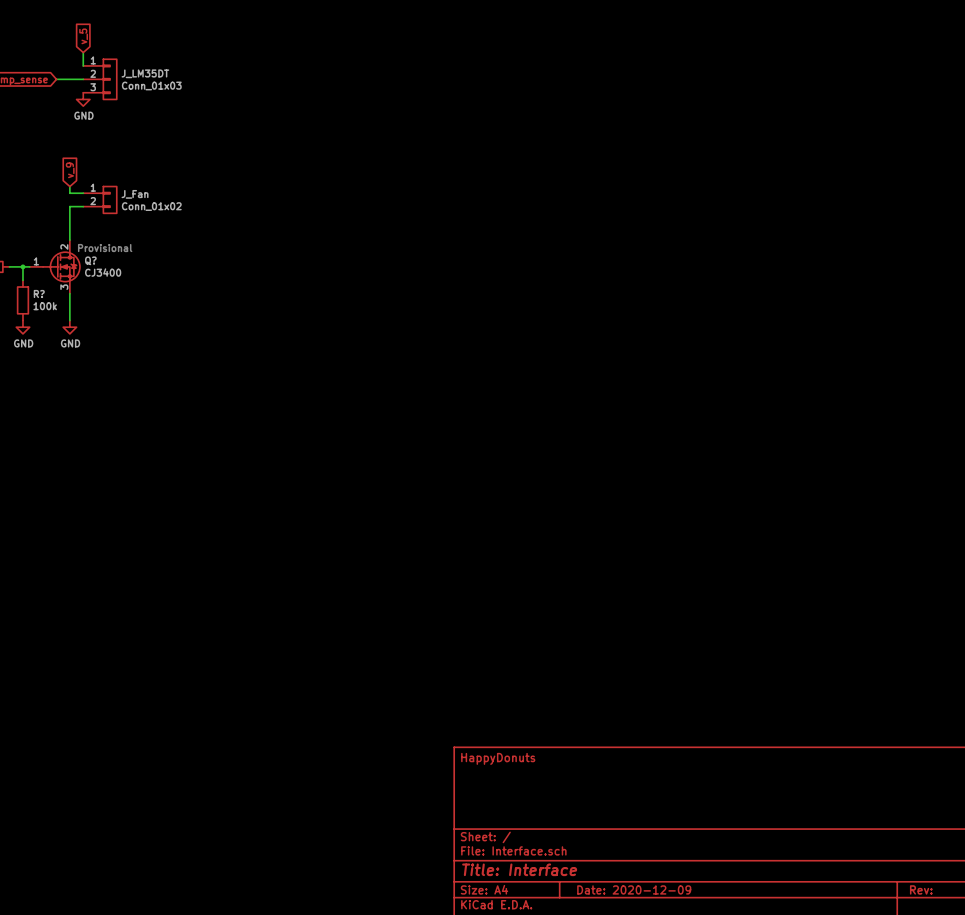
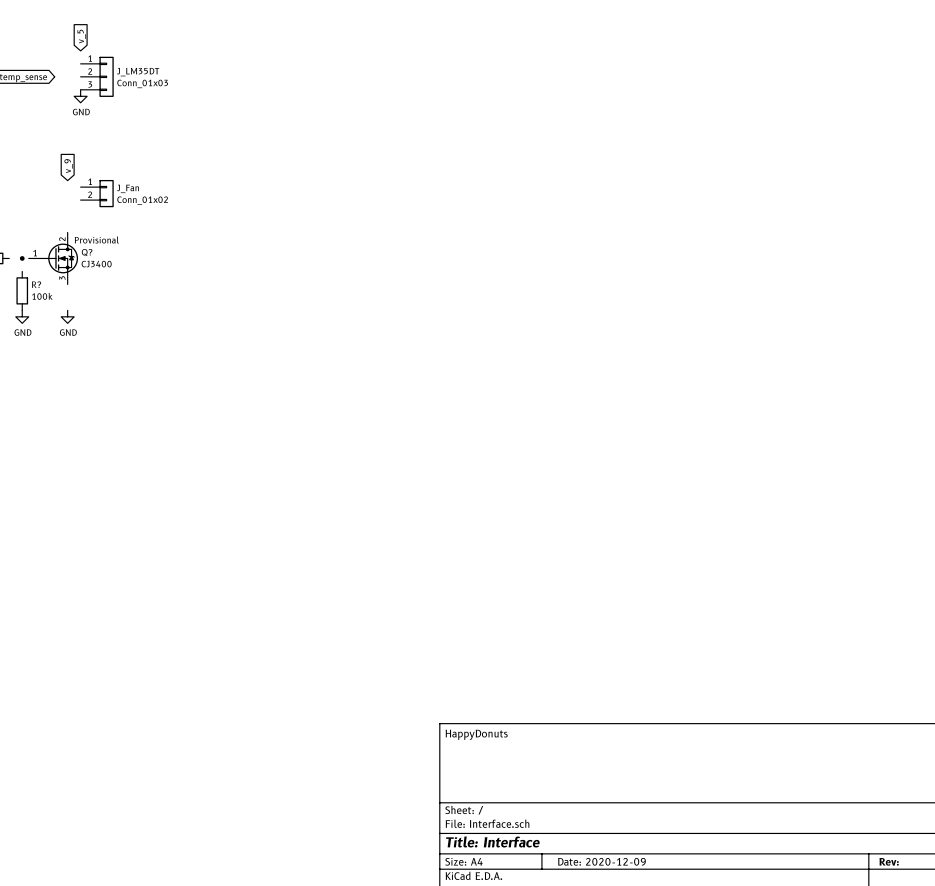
wire: (83, 52) (83, 65) -> none
wire: (56, 79) (83, 79) -> none
wire: (69, 186) (69, 193) (83, 193) -> none
wire: (83, 206) (69, 206) (69, 240) -> none
wire: (9, 266) (29, 266) -> none
wire: (22, 266) (22, 280) -> none
wire: (69, 293) (69, 320) -> none

